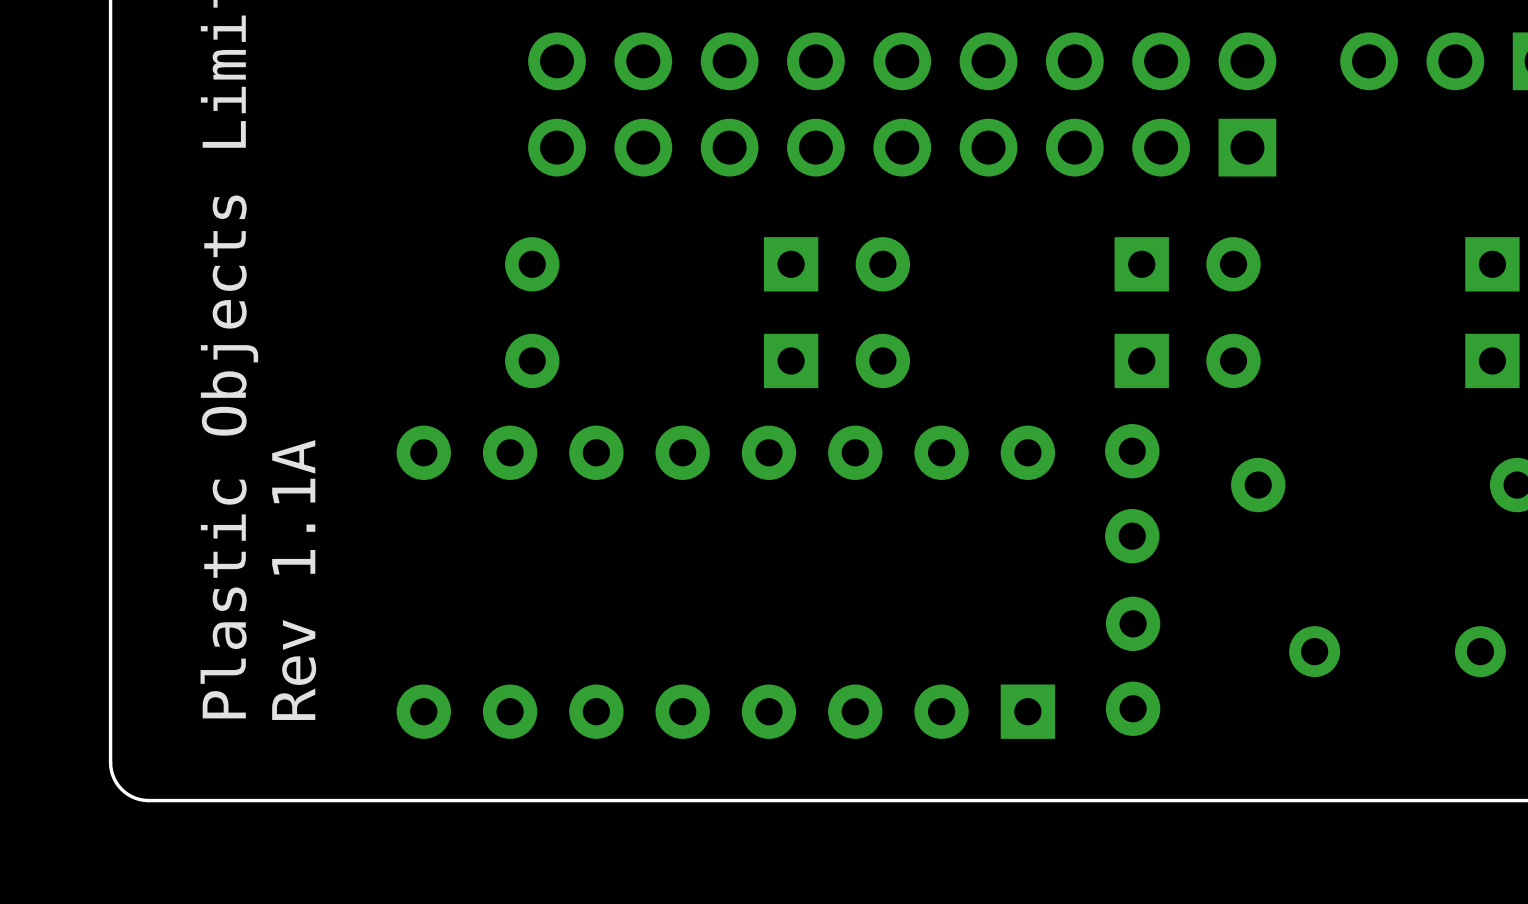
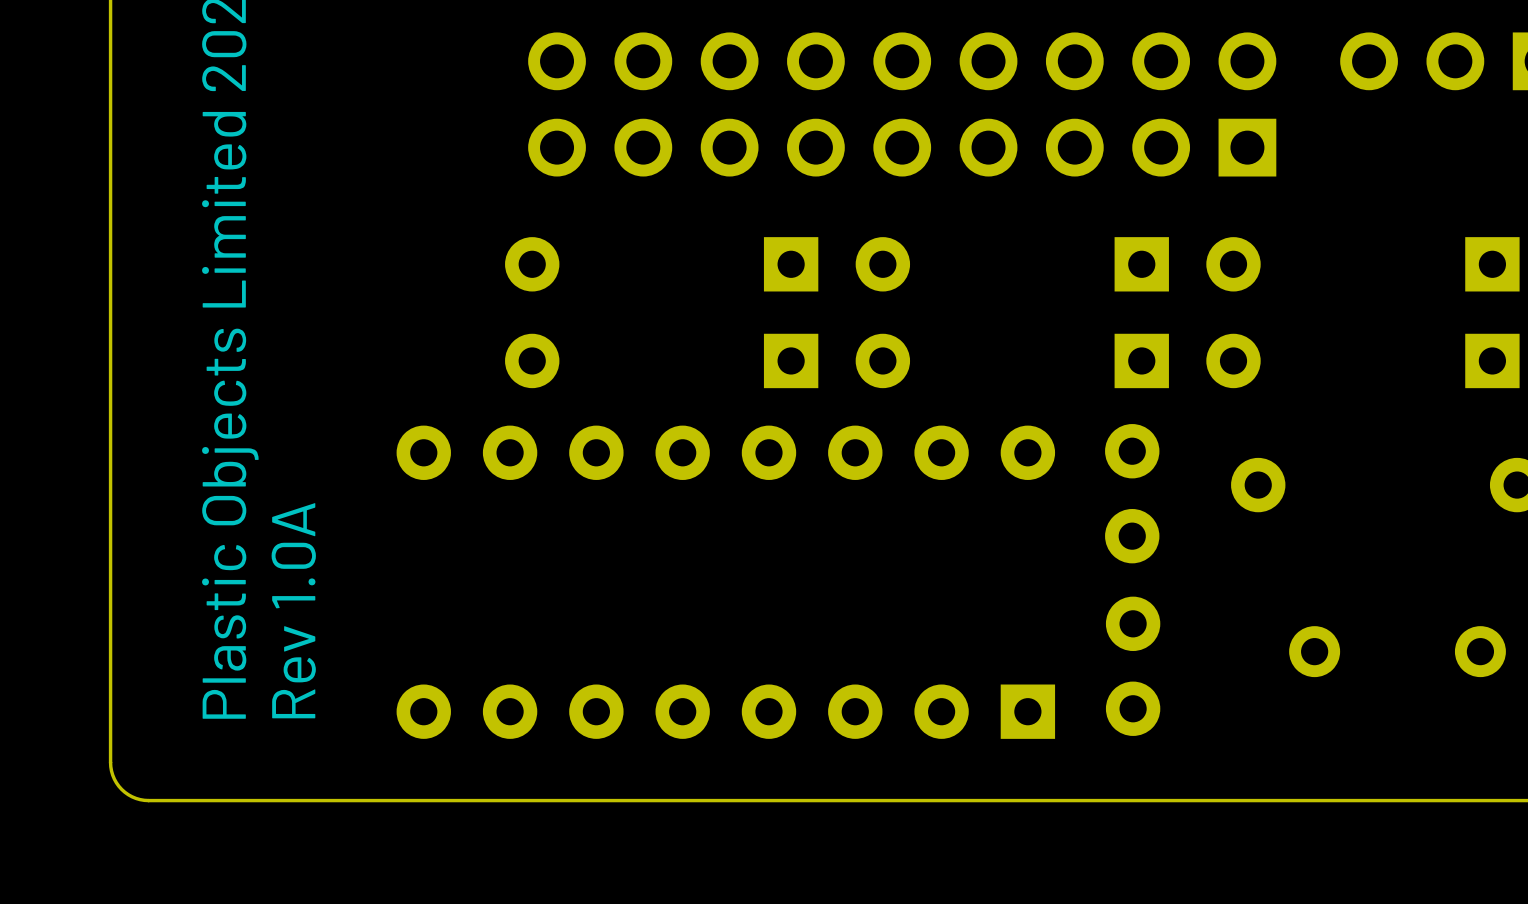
text: Rev 1.1A (294, 580) -> Rev 1.0A (293, 610)

